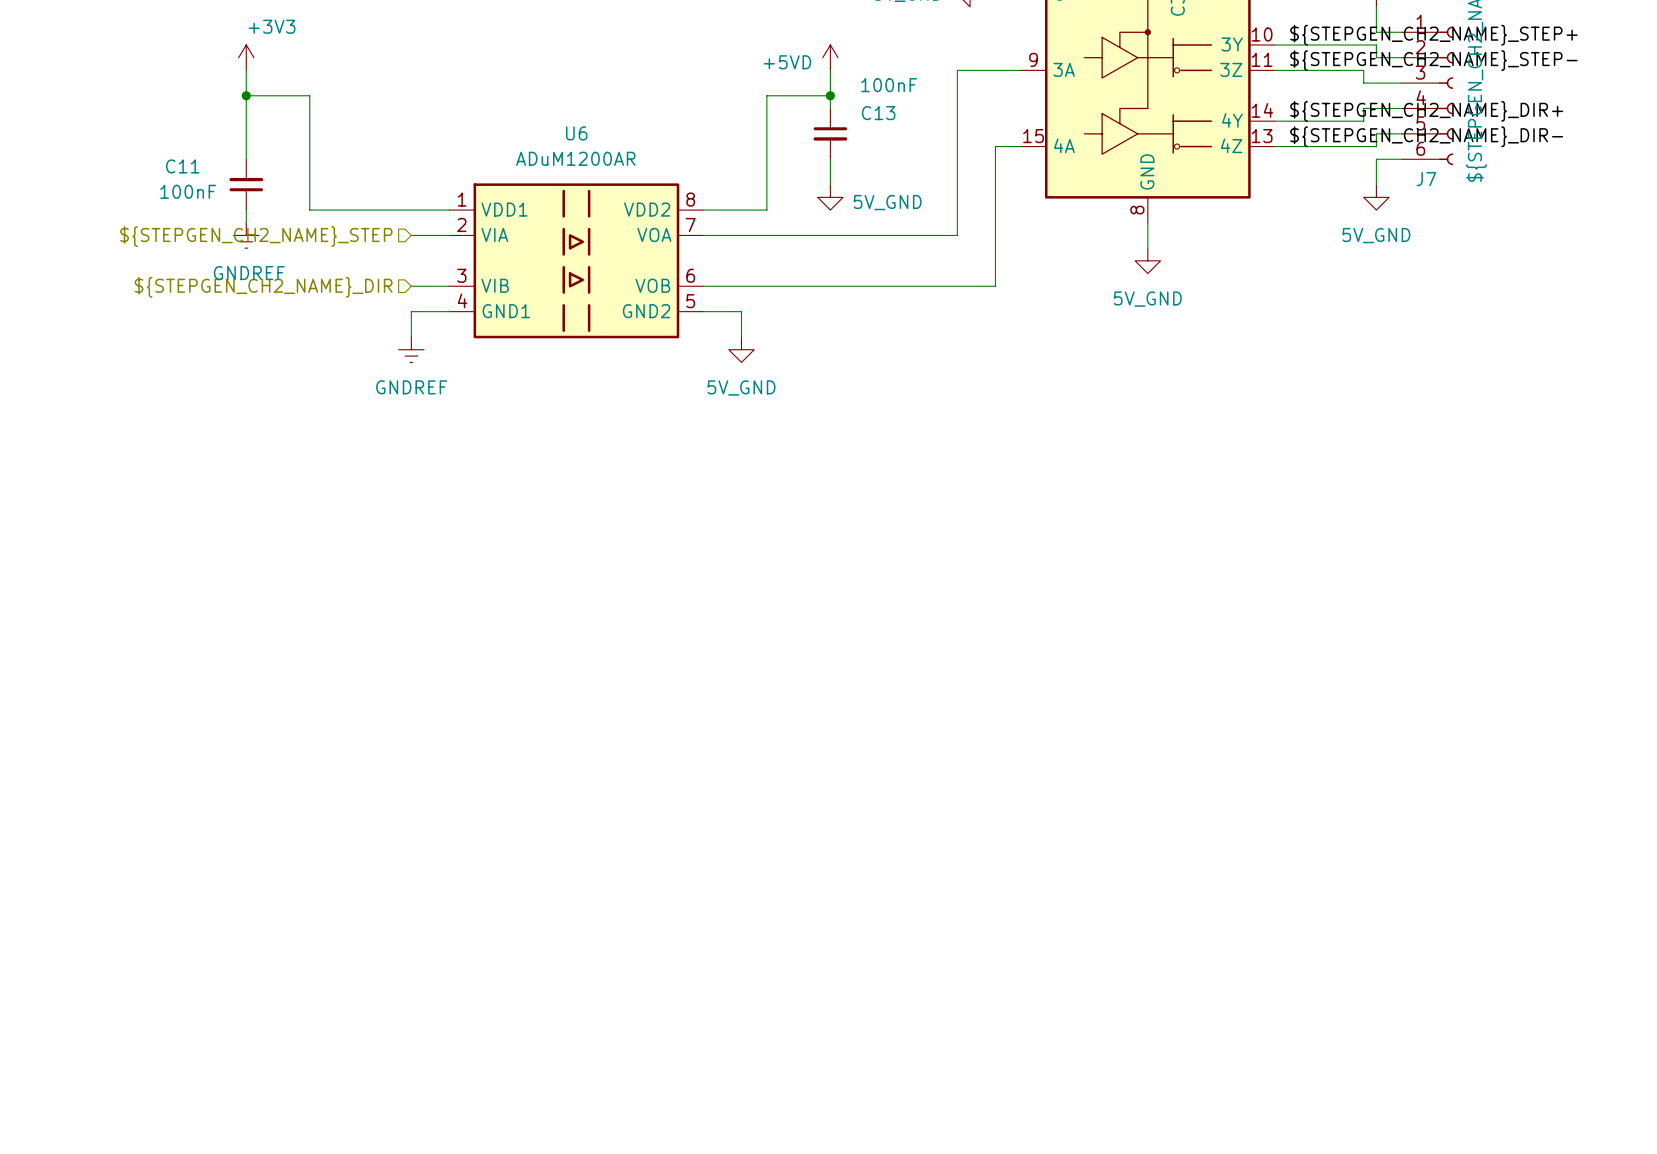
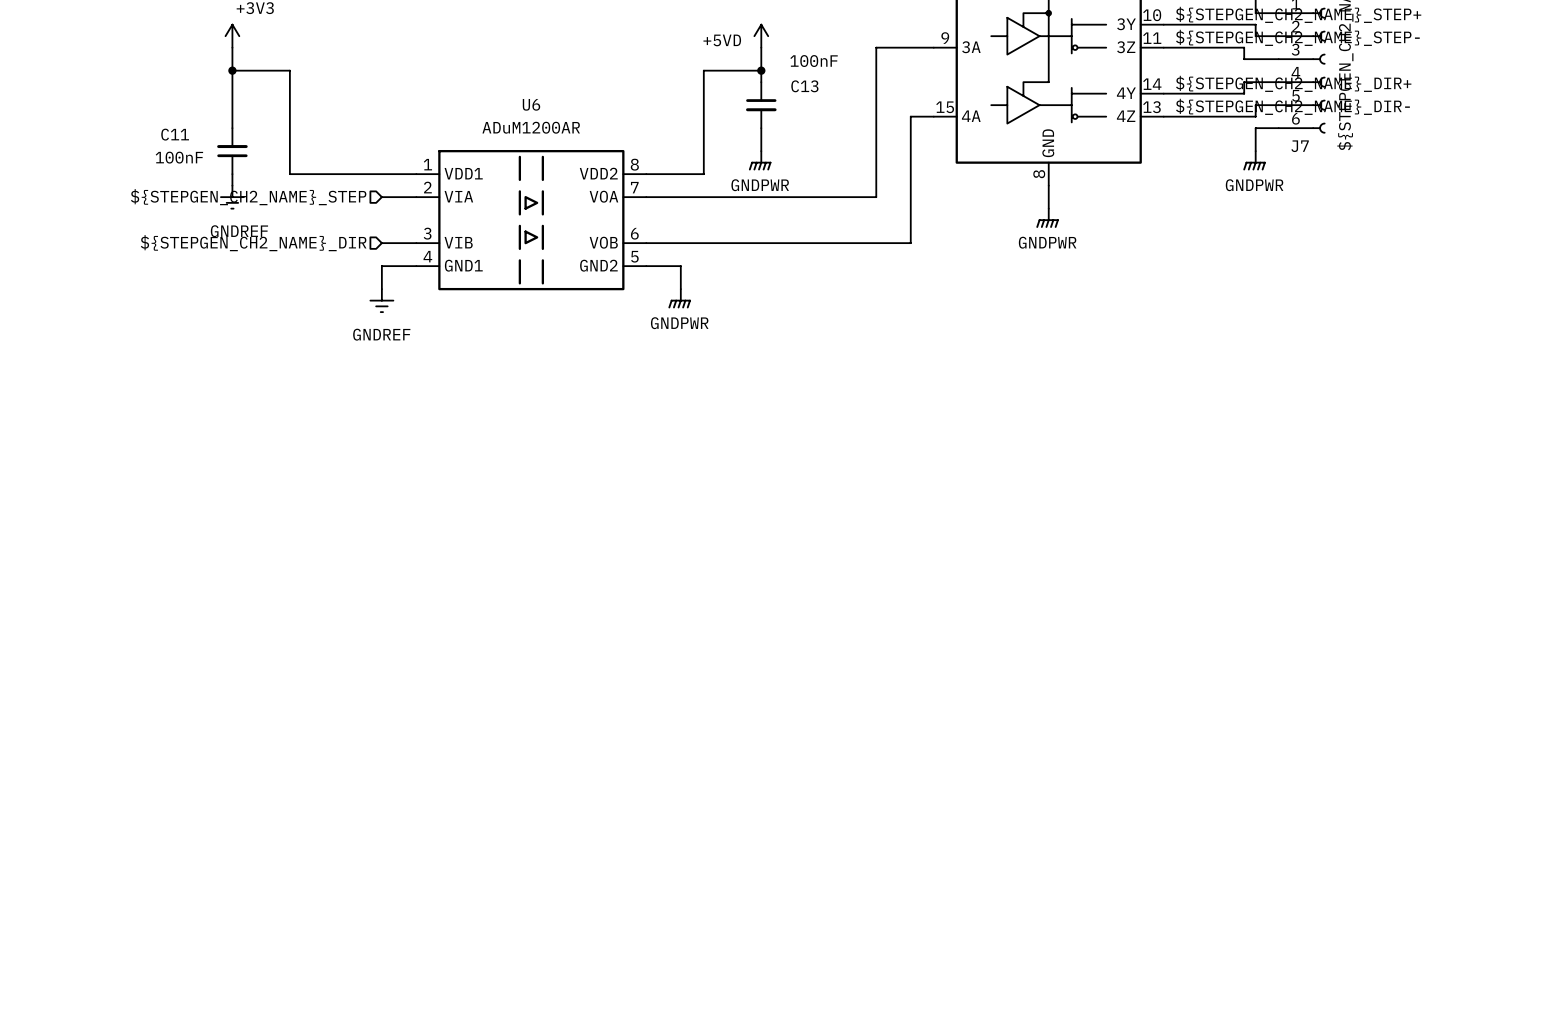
power symbol: 5V_GND (830, 197) -> GNDPWR (760, 160)
power symbol: 5V_GND (1376, 197) -> GNDPWR (1254, 160)
power symbol: 5V_GND (1147, 260) -> GNDPWR (1047, 218)
power symbol: 5V_GND (741, 349) -> GNDPWR (679, 298)

